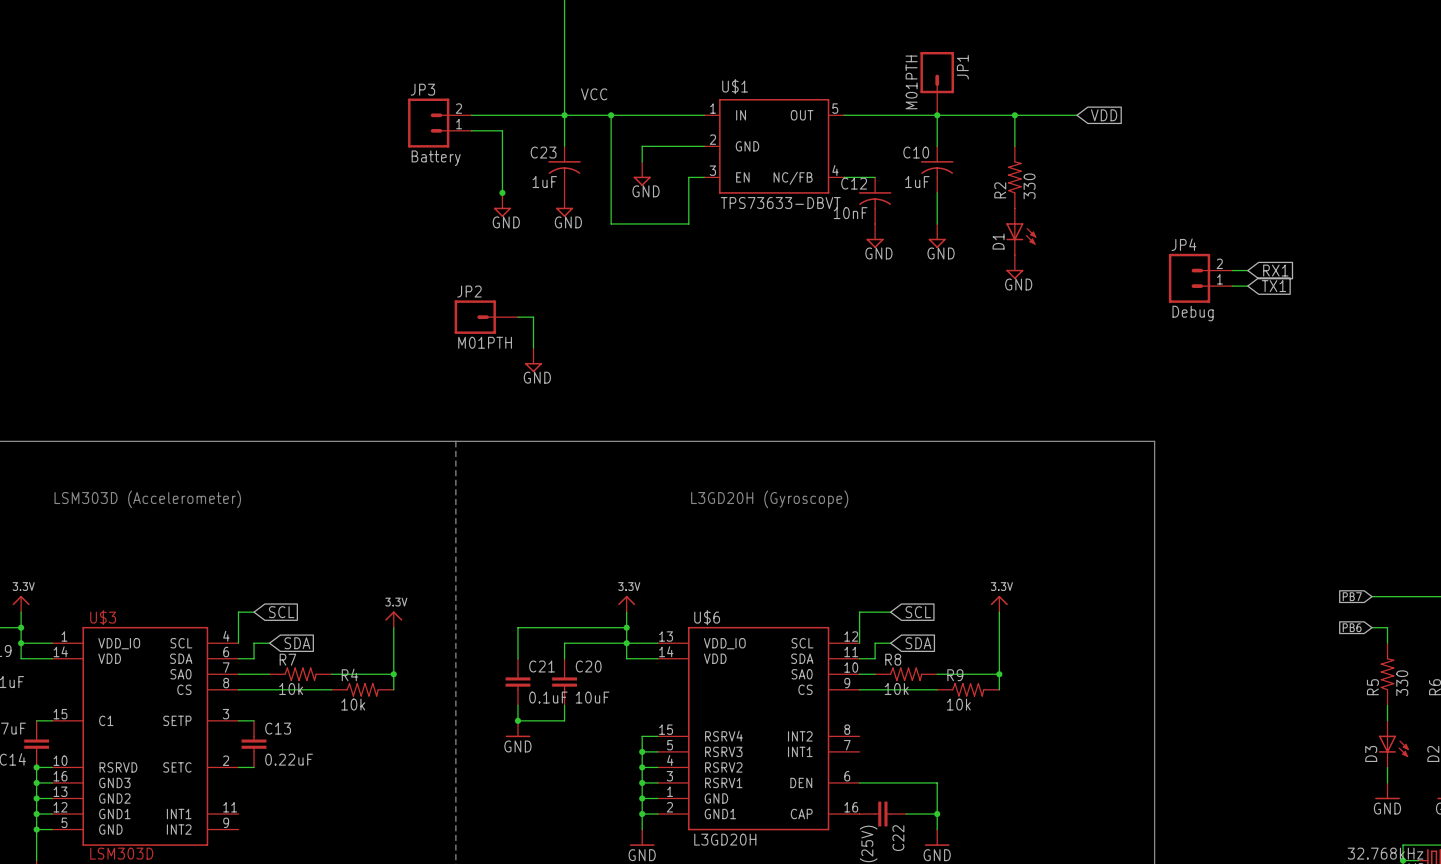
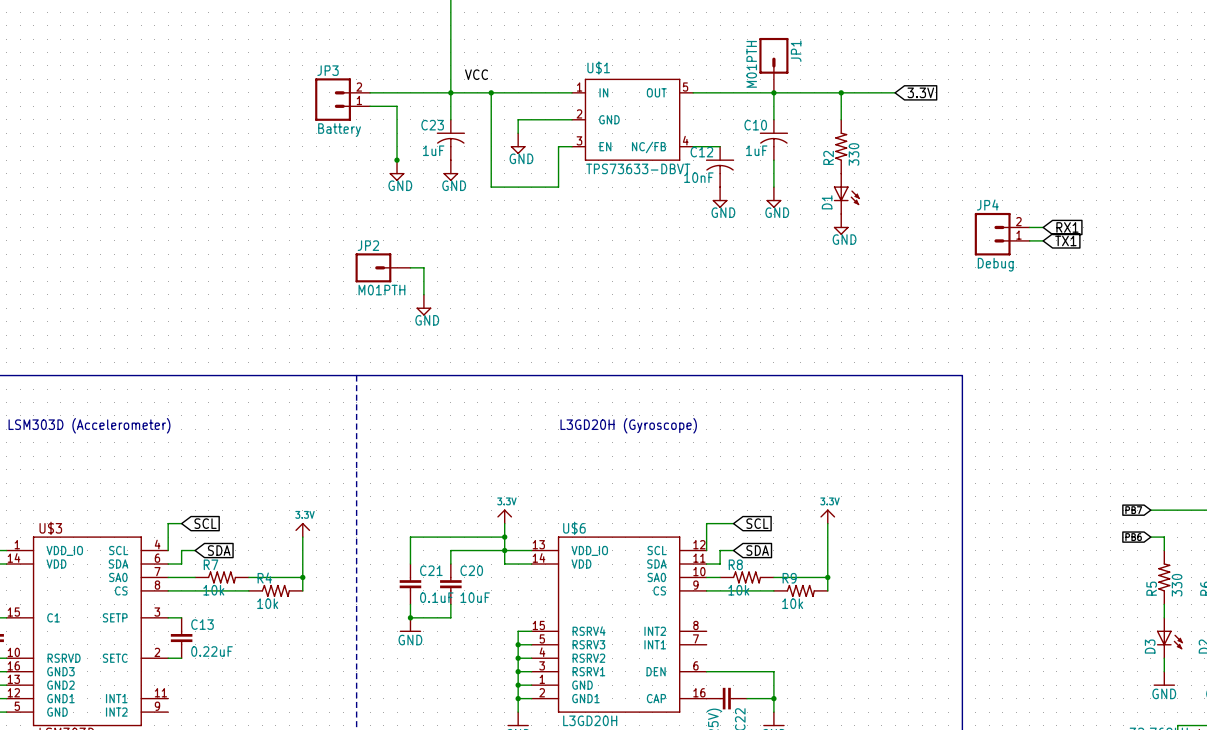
global label: VDD (1104, 115) -> 3.3V (920, 92)

